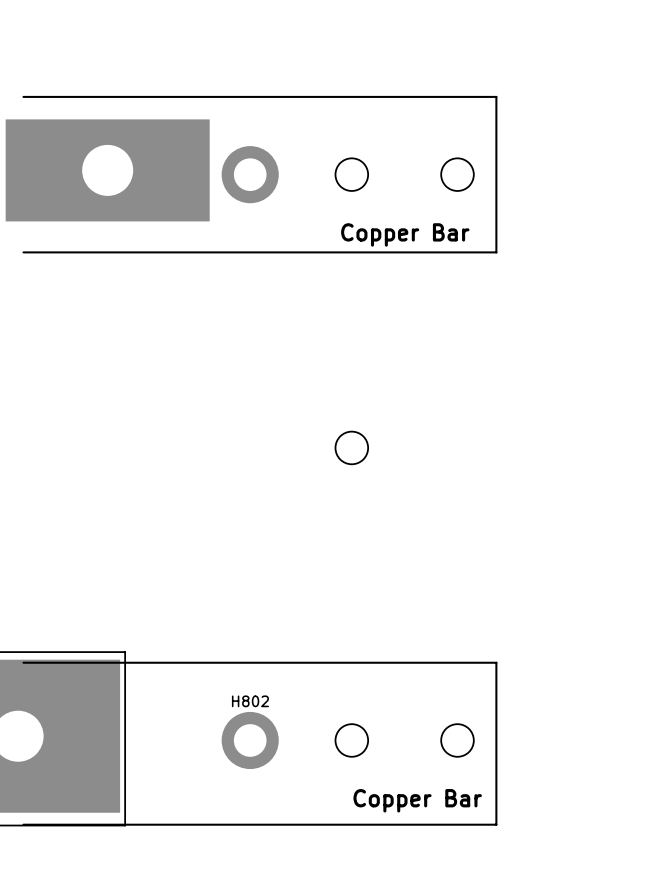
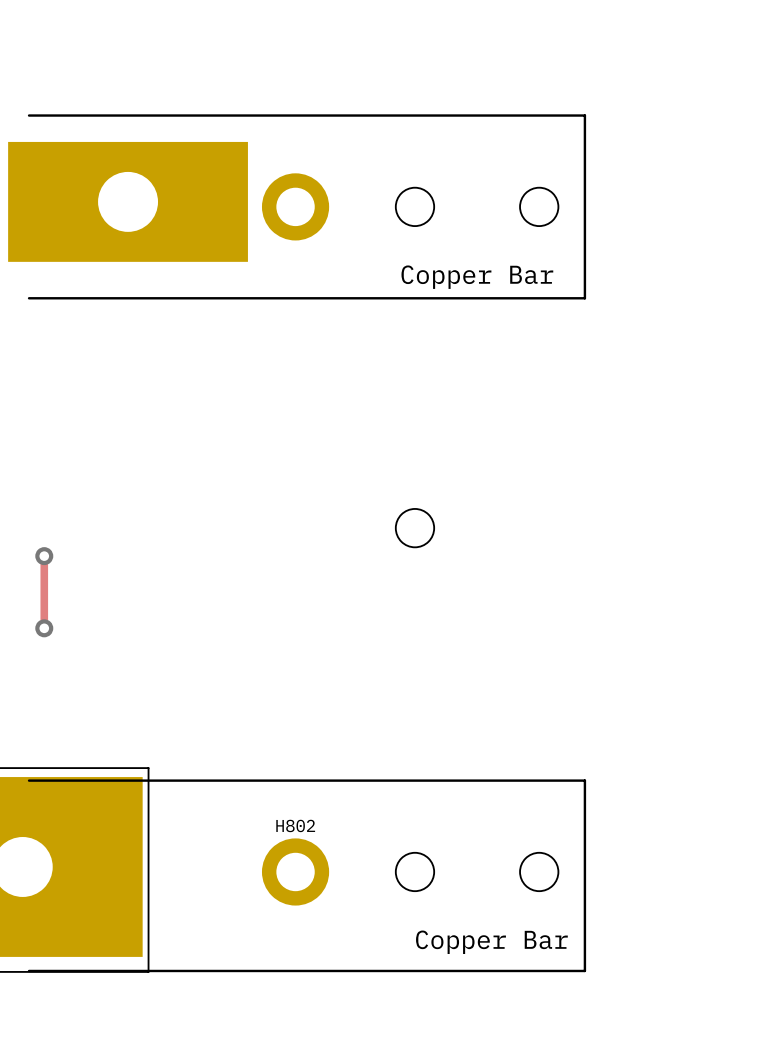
track: none -> (44, 556) (44, 628)
via: none -> (44, 556)
via: none -> (44, 628)

